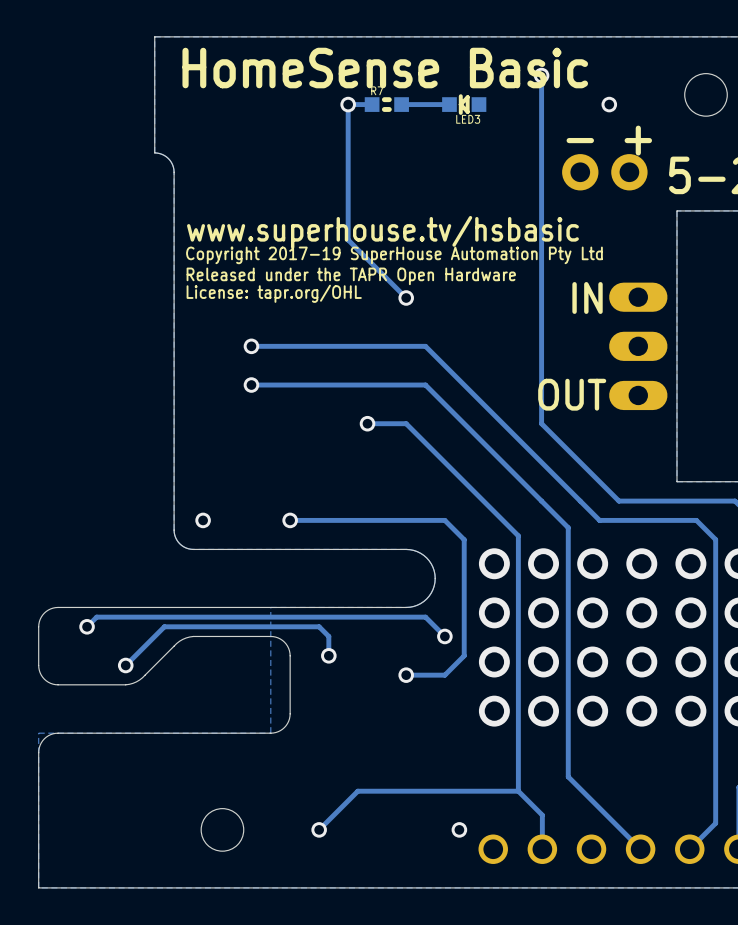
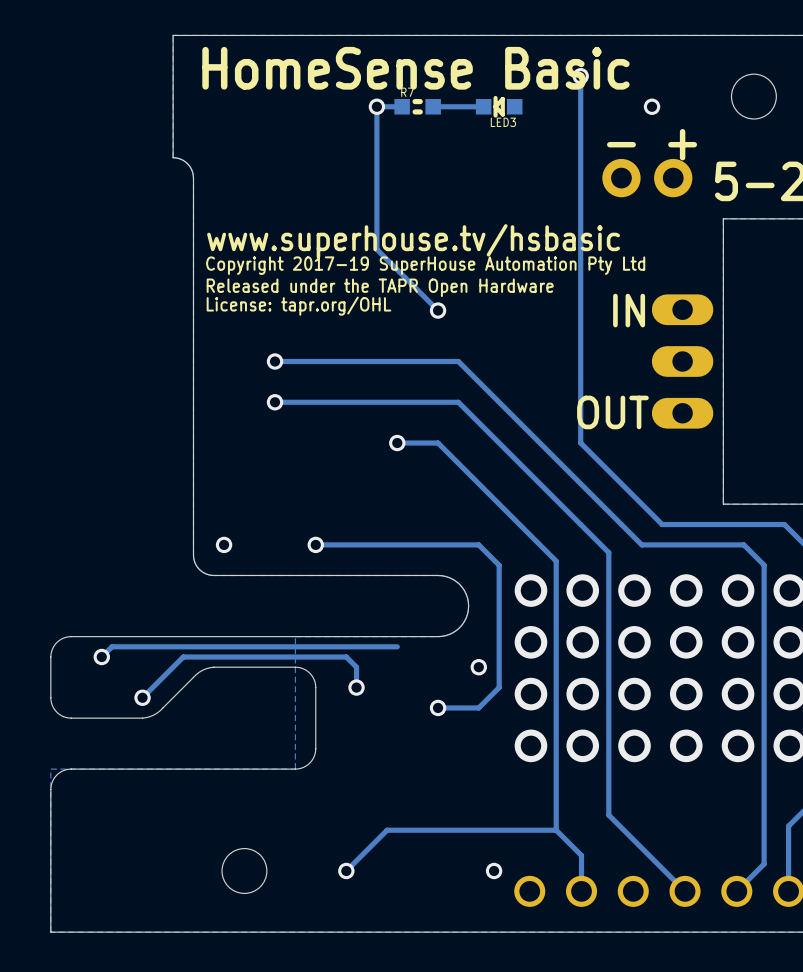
track: (367, 617) (425, 617) (444, 636) -> none

